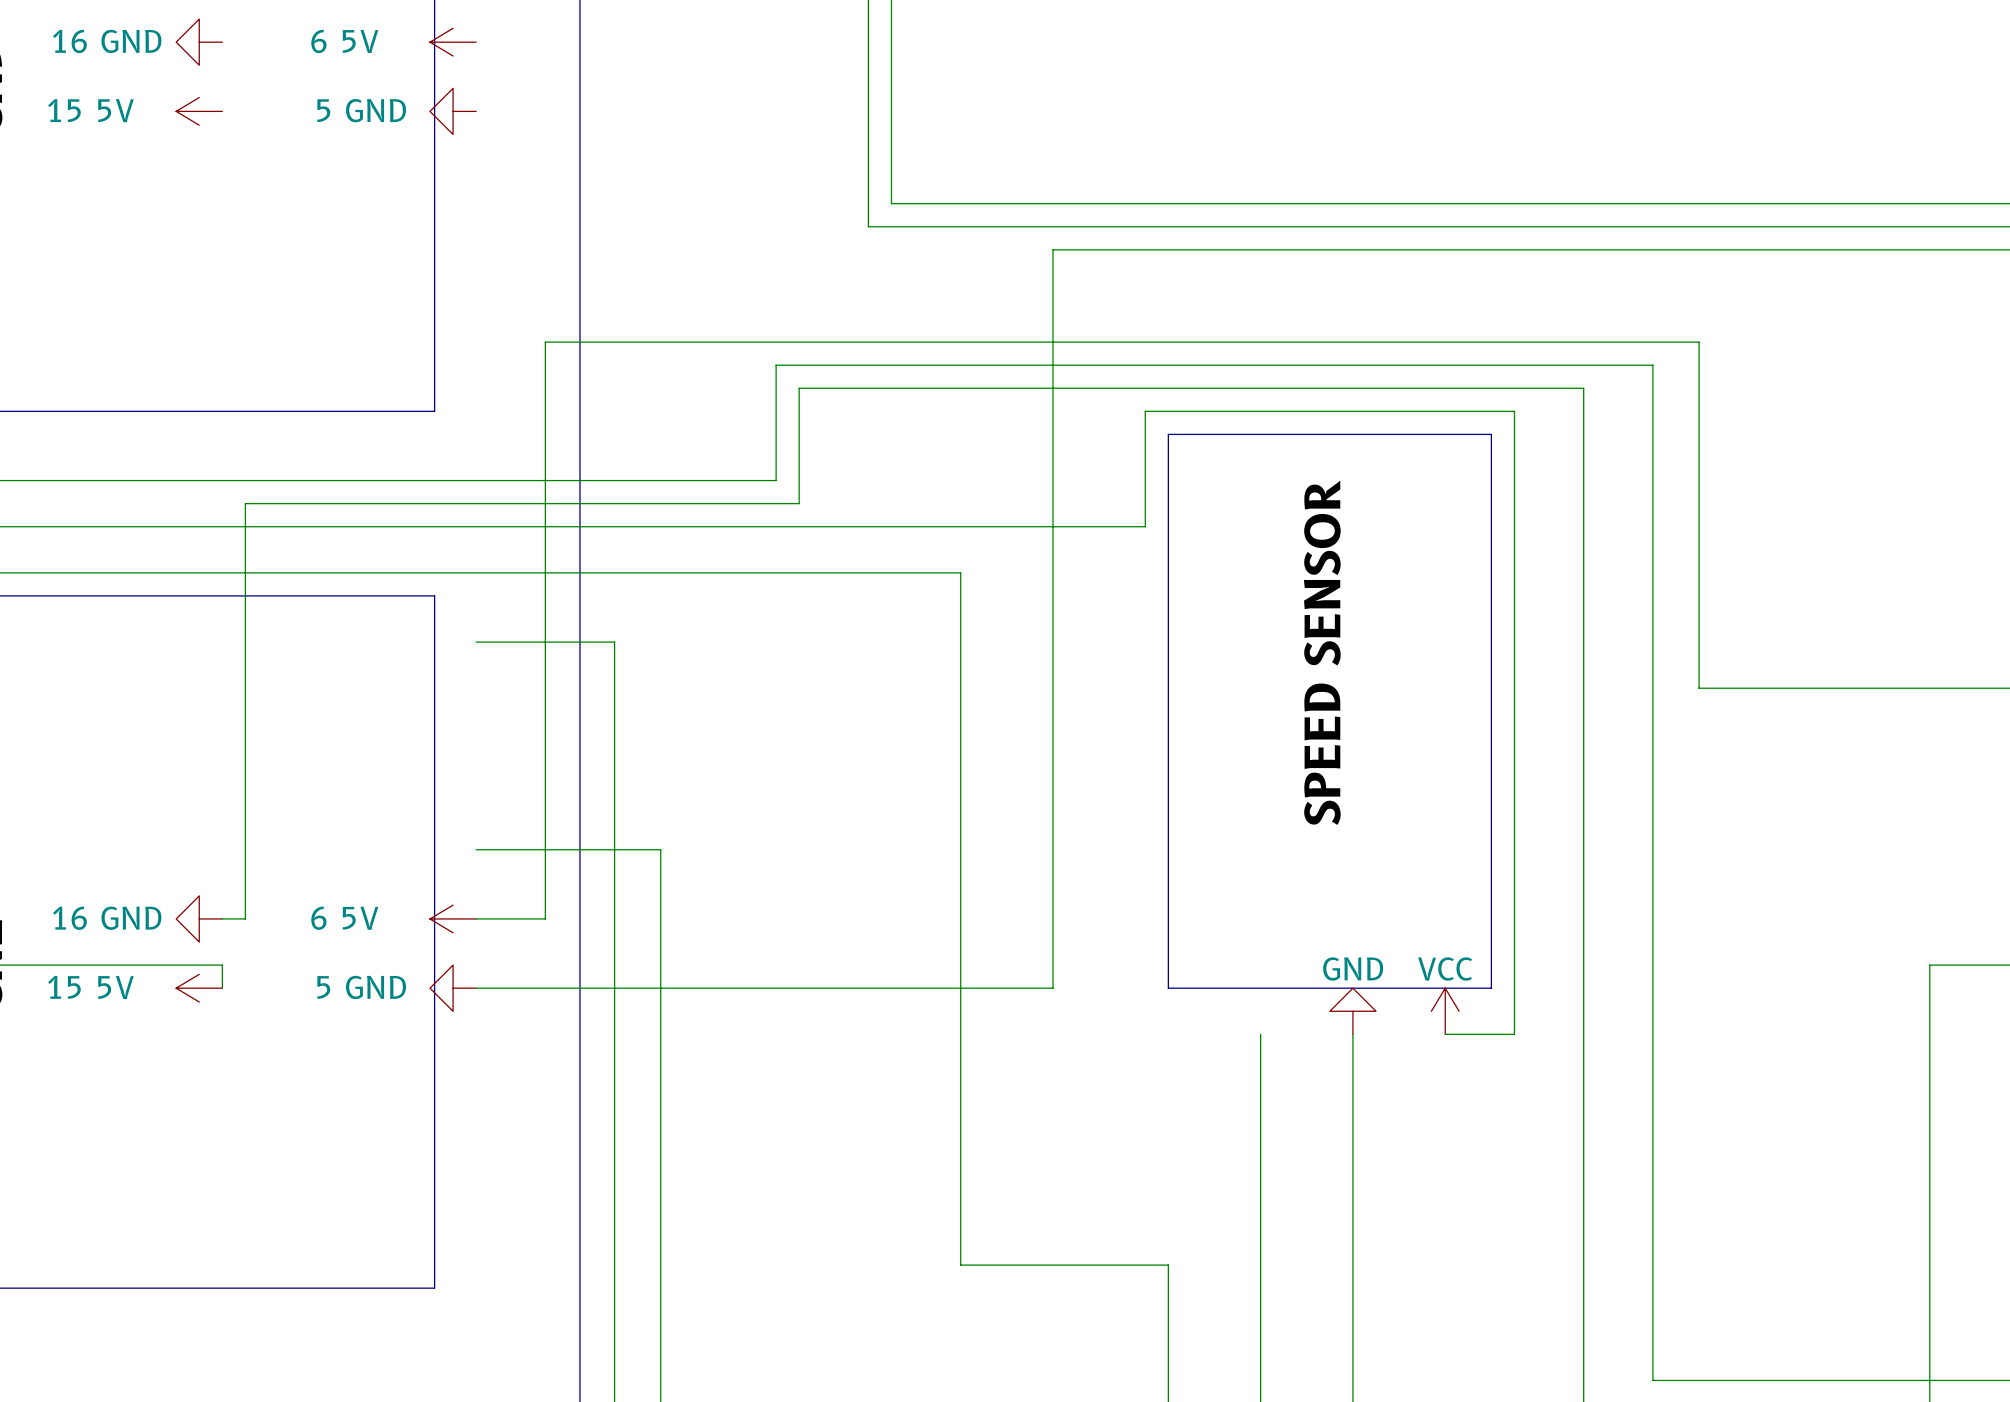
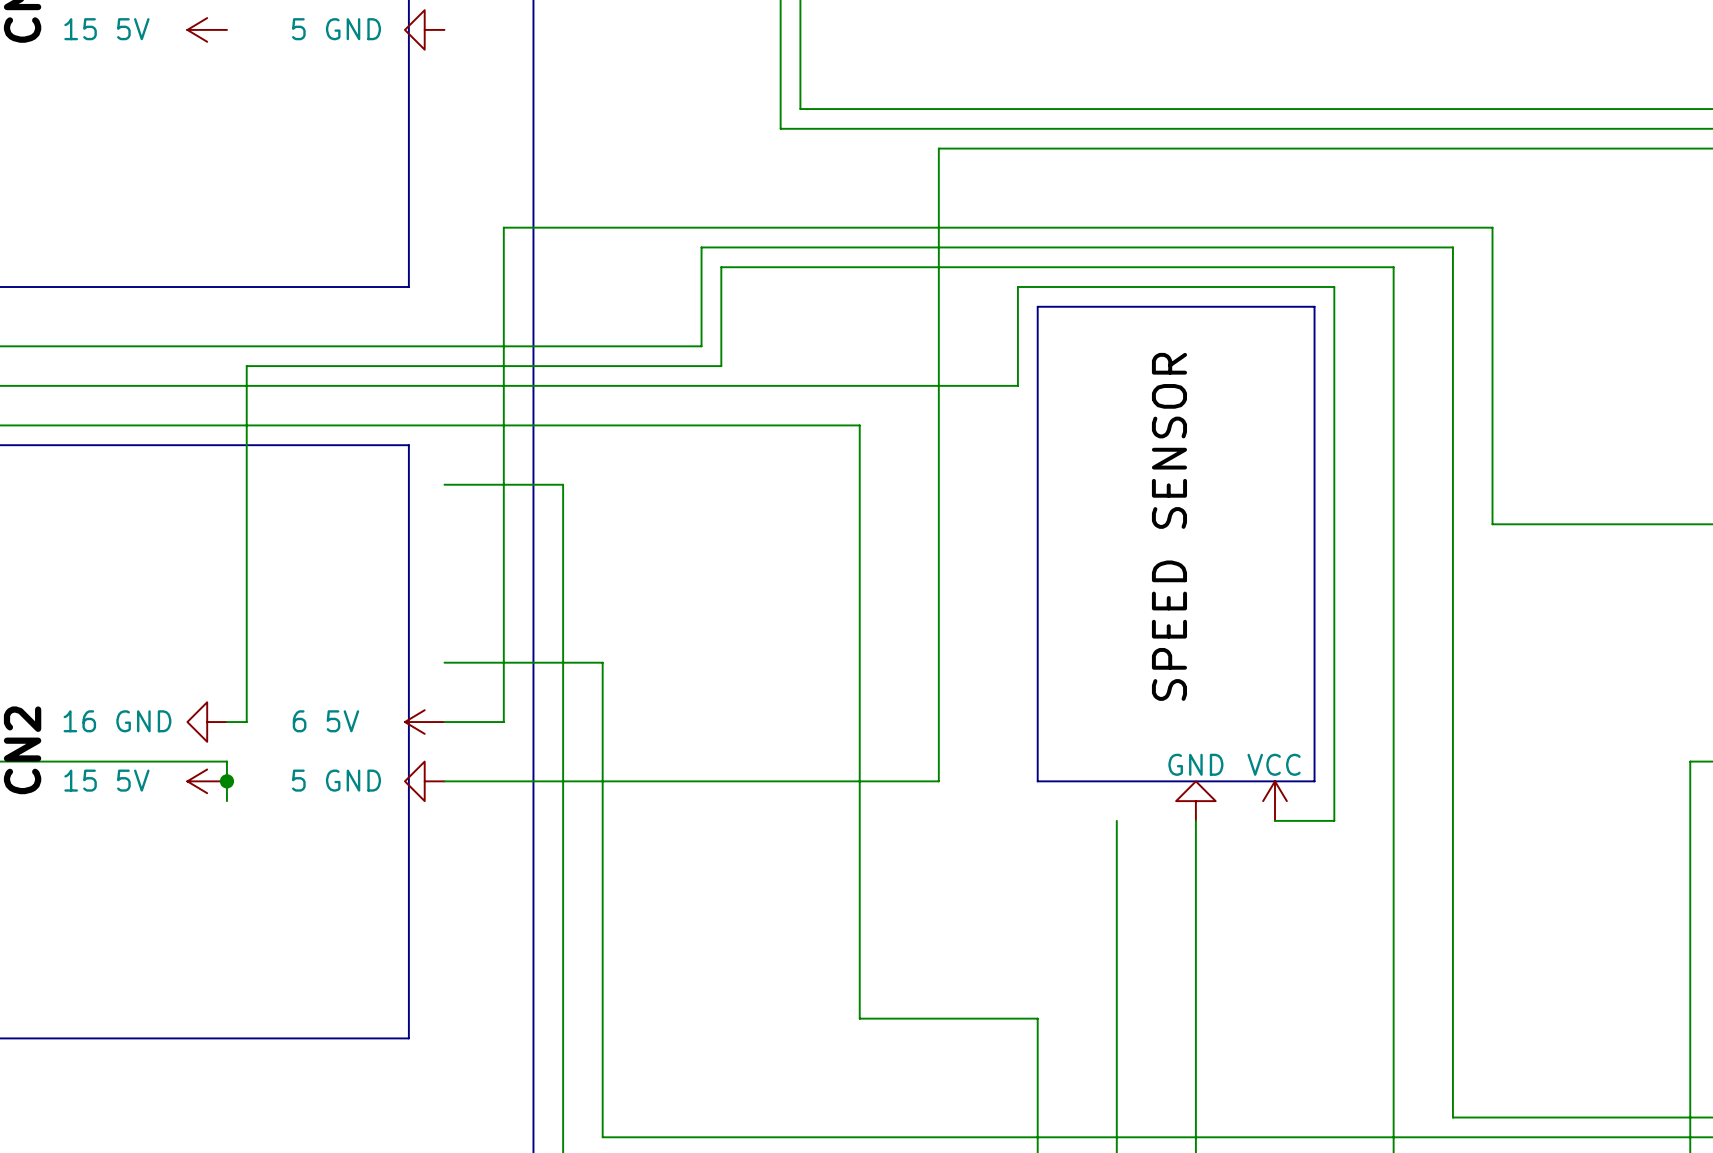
wire: none -> (226, 781) (226, 801)
junction: none -> (226, 781)

